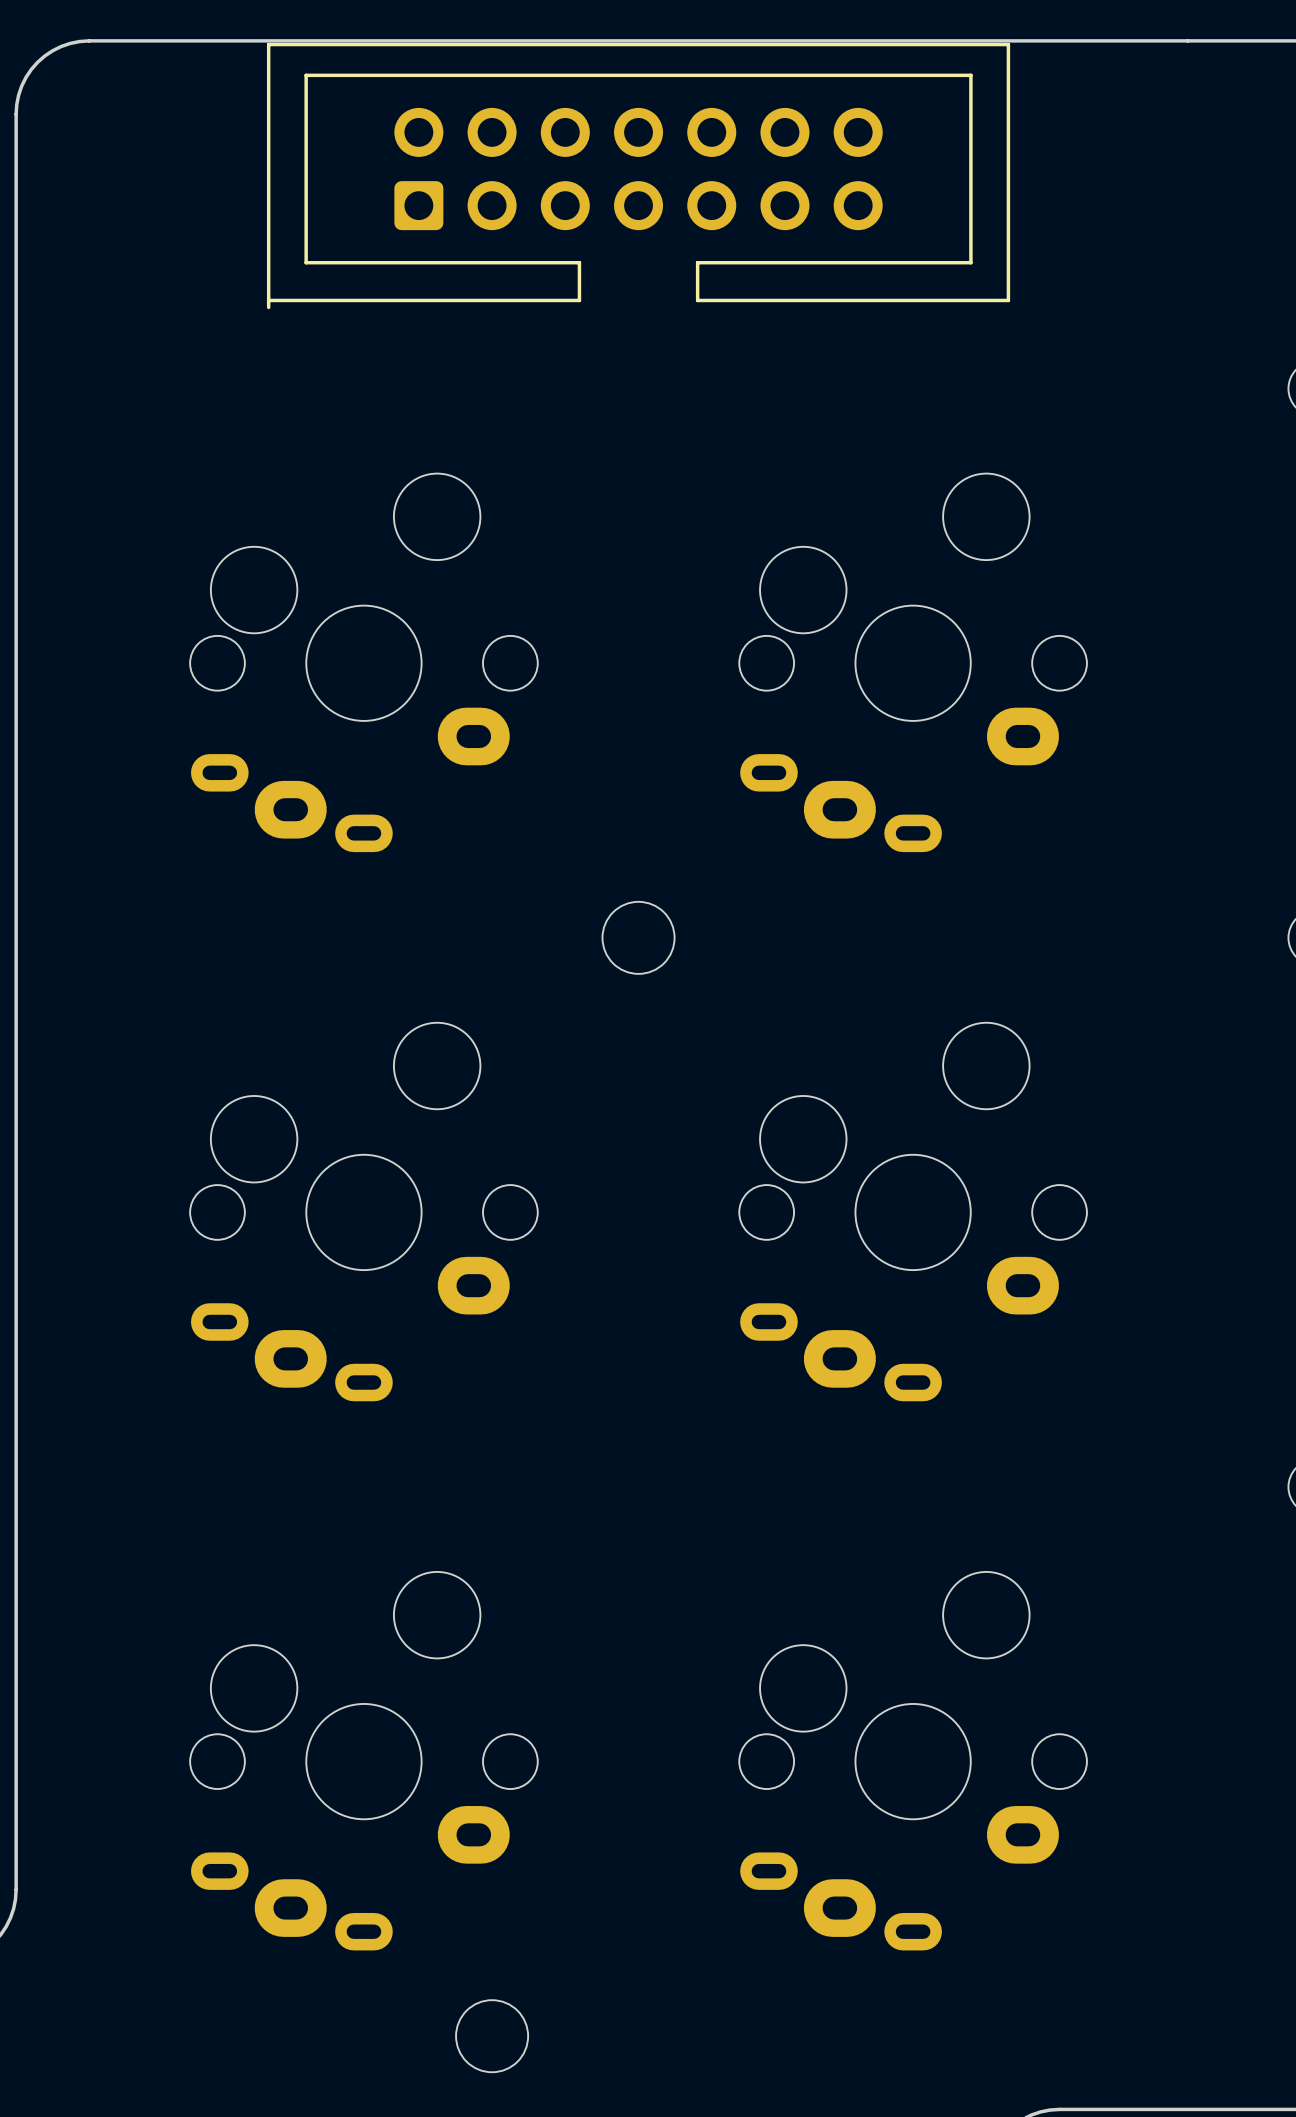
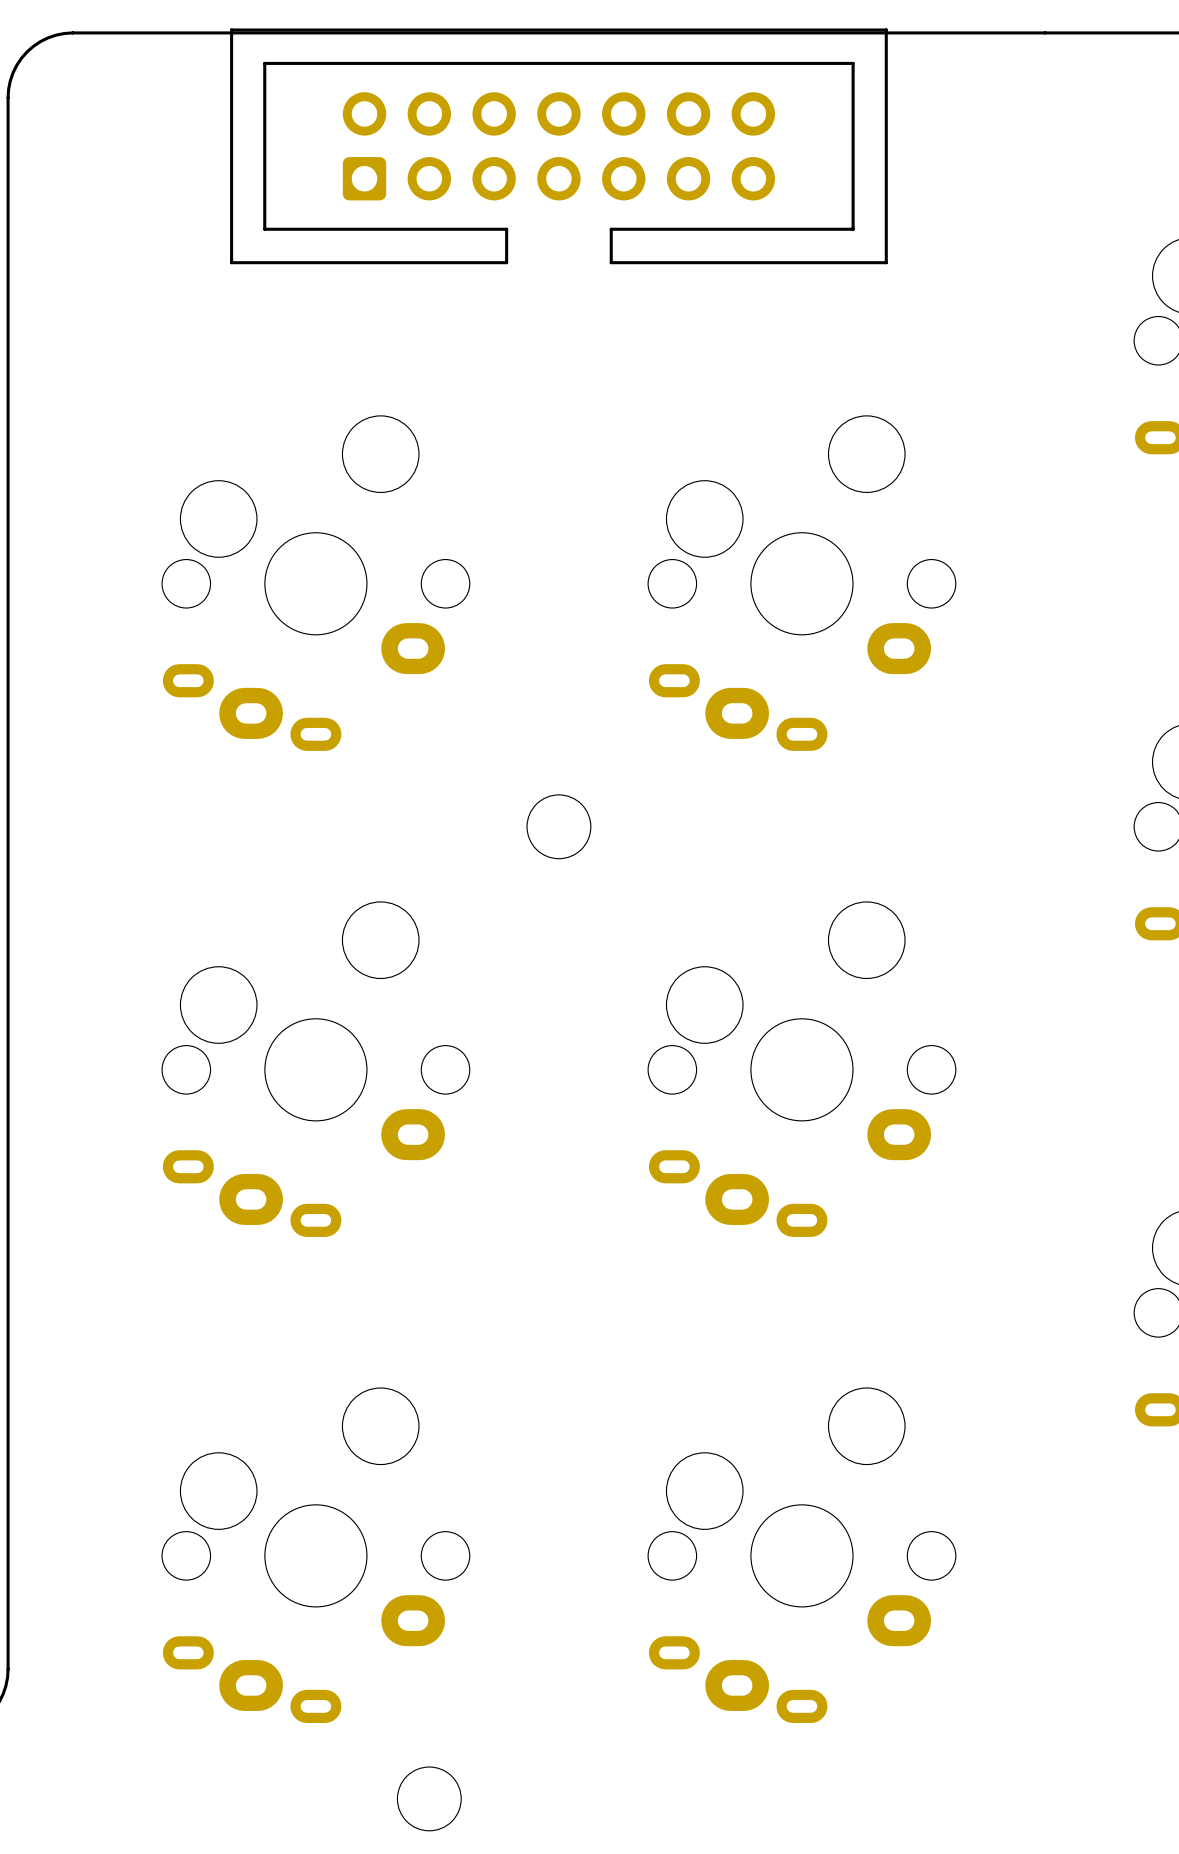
part footprint: [266, 42, 1011, 310] -> [230, 28, 888, 265]

